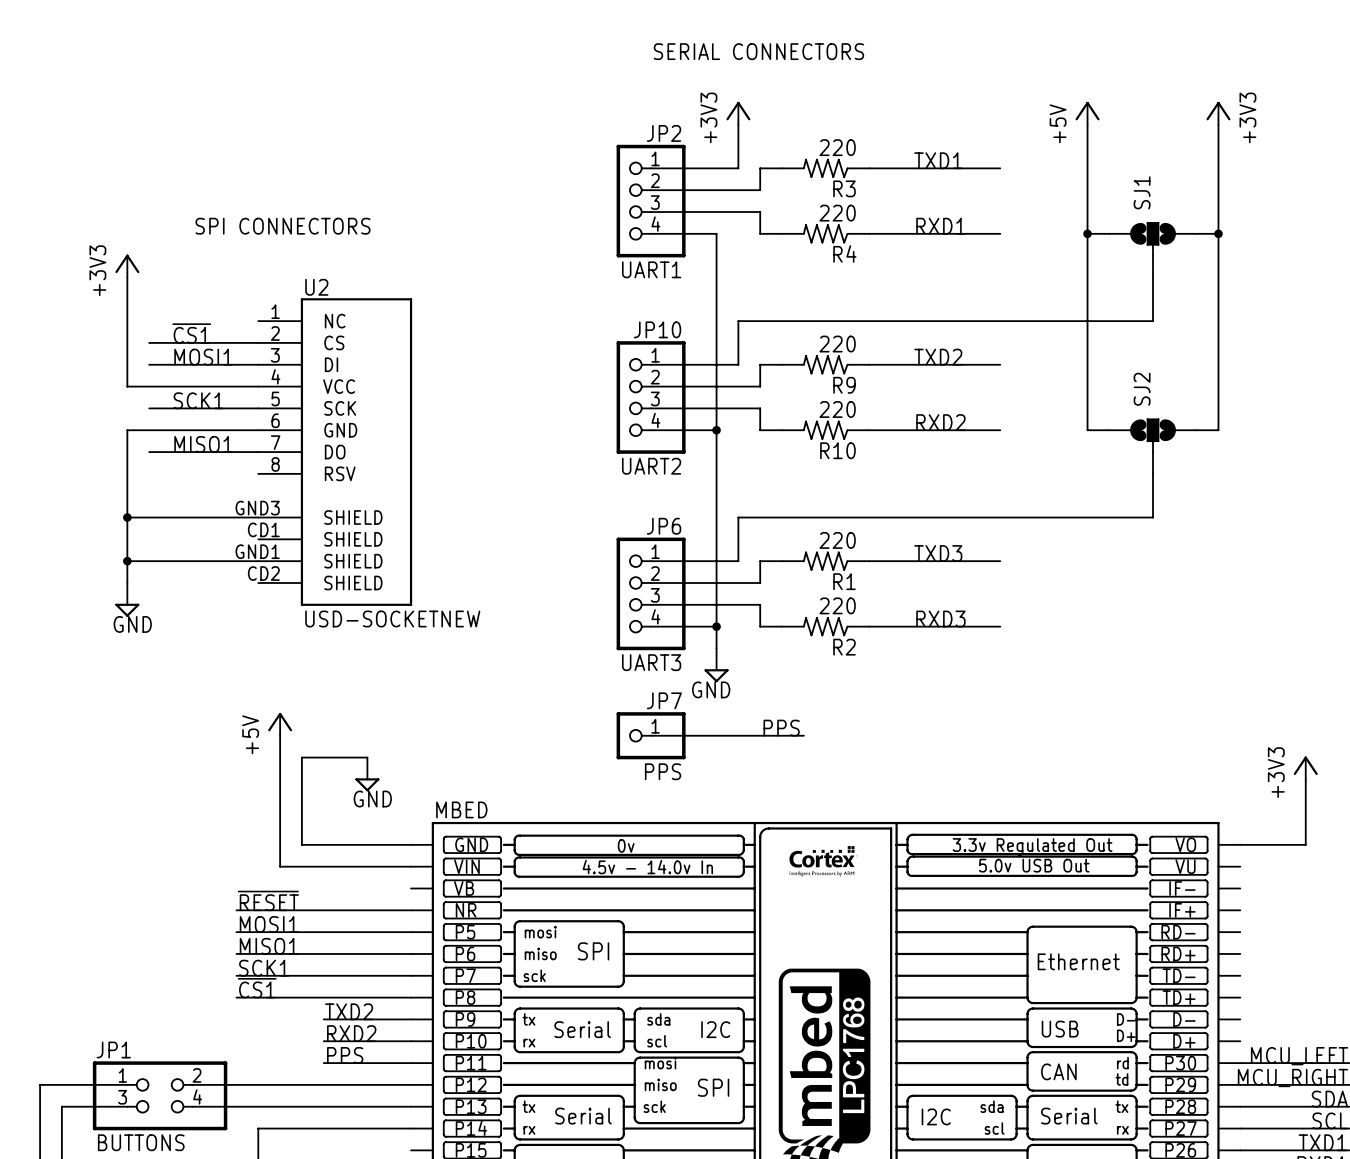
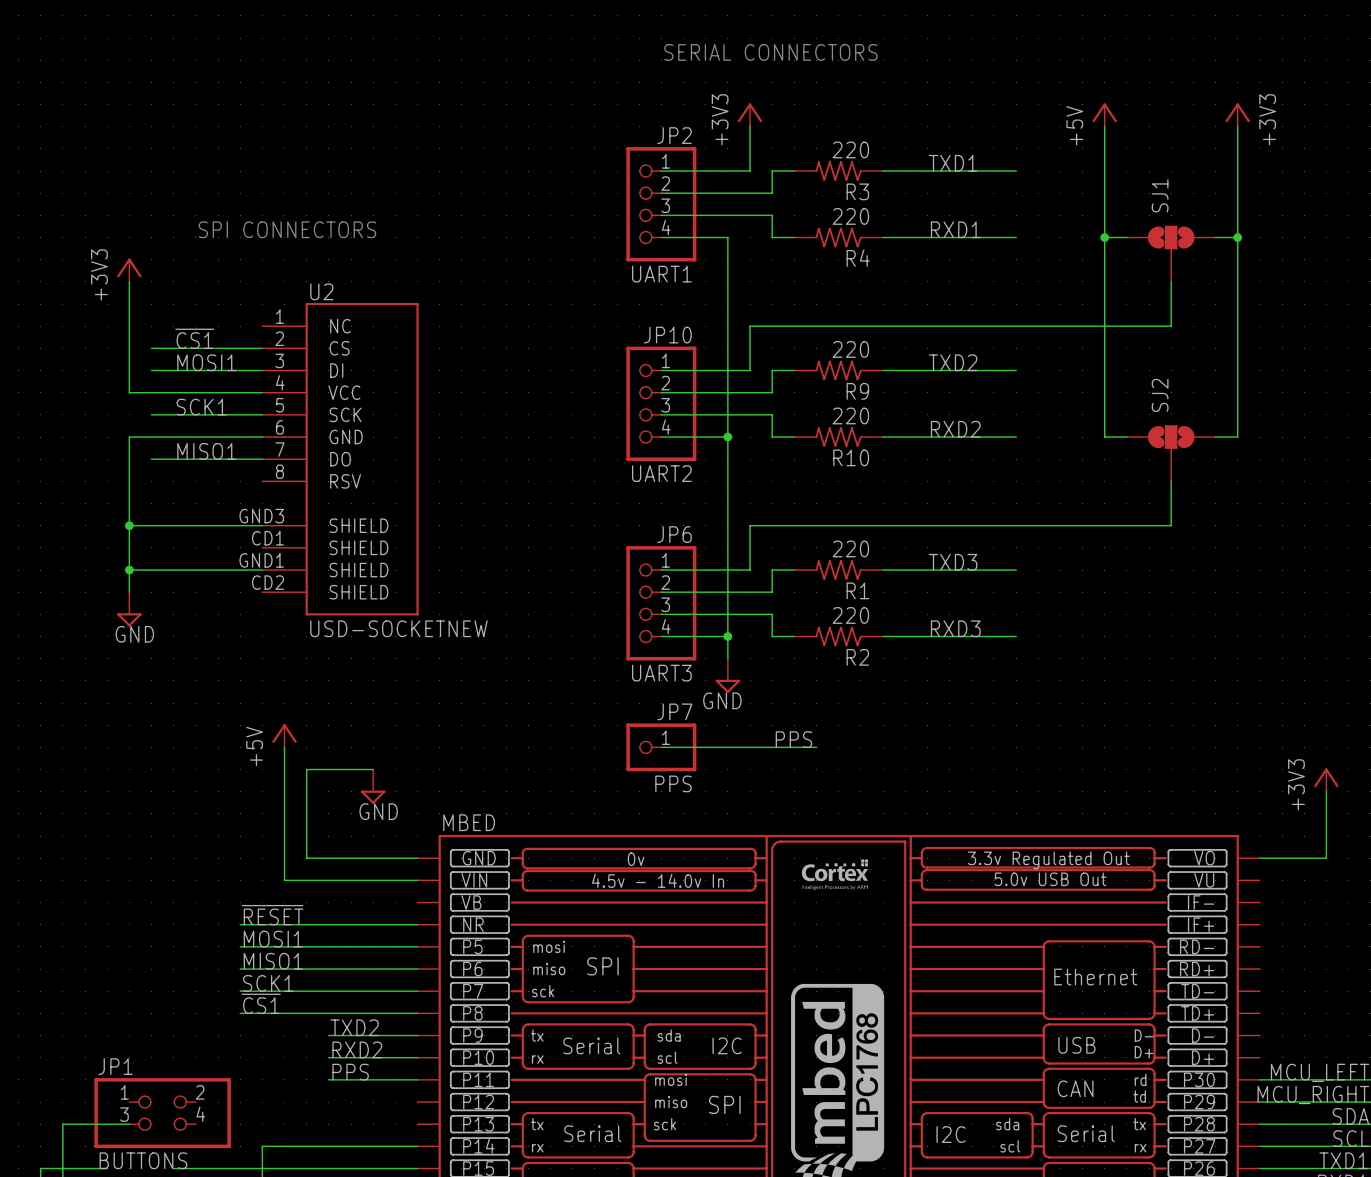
wire: (127, 1084) (40, 1084) (40, 1150) -> (107, 1168) (40, 1168)
wire: (192, 1084) (411, 1084) -> none
wire: (192, 1106) (411, 1106) -> none
wire: none -> (173, 1168) (417, 1168)

